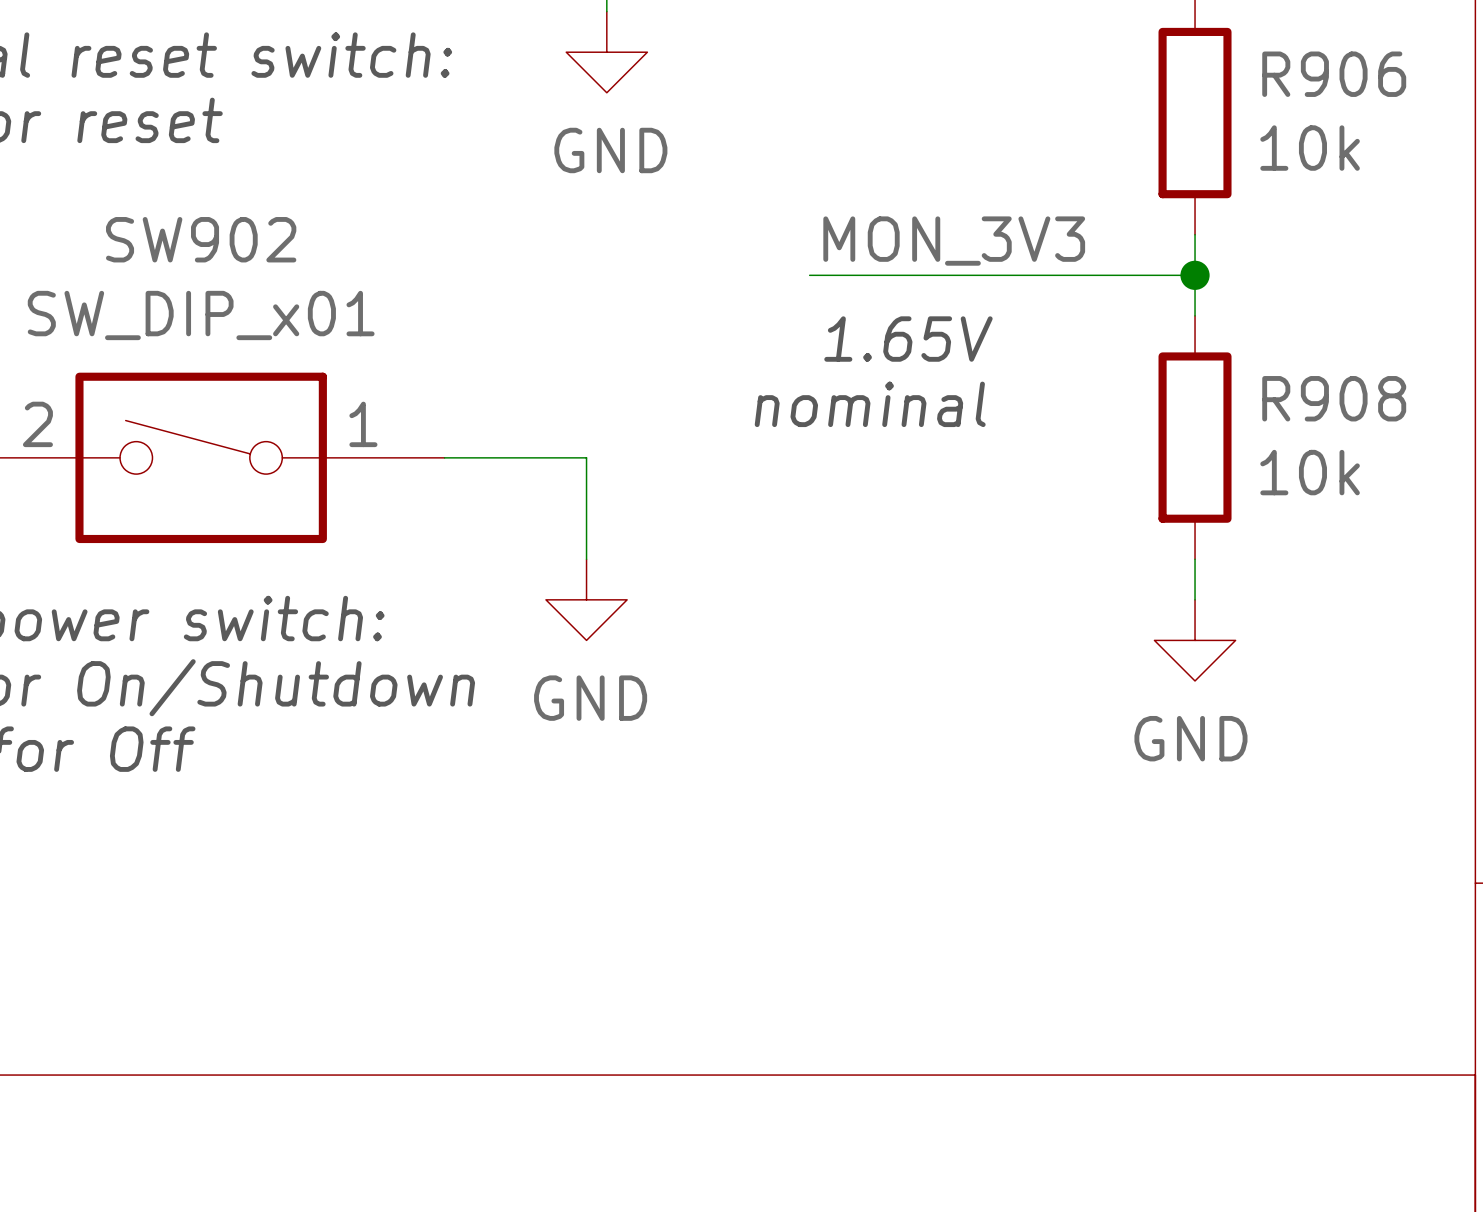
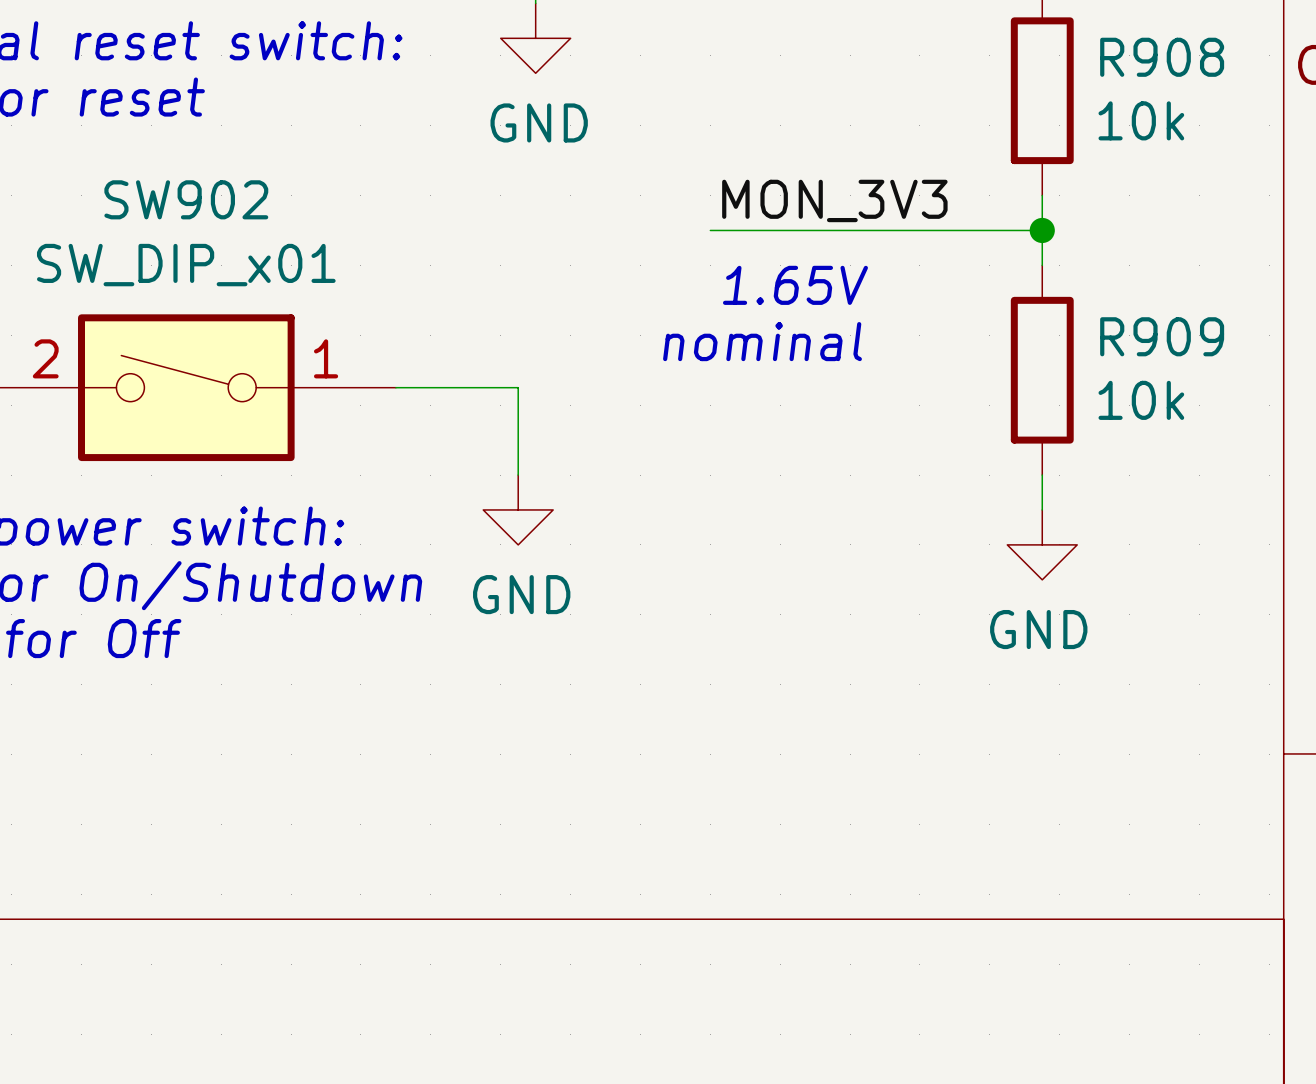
R906 name: R906 (1334, 74) -> R908 (1162, 57)
R908 name: R908 (1334, 398) -> R909 (1162, 336)

